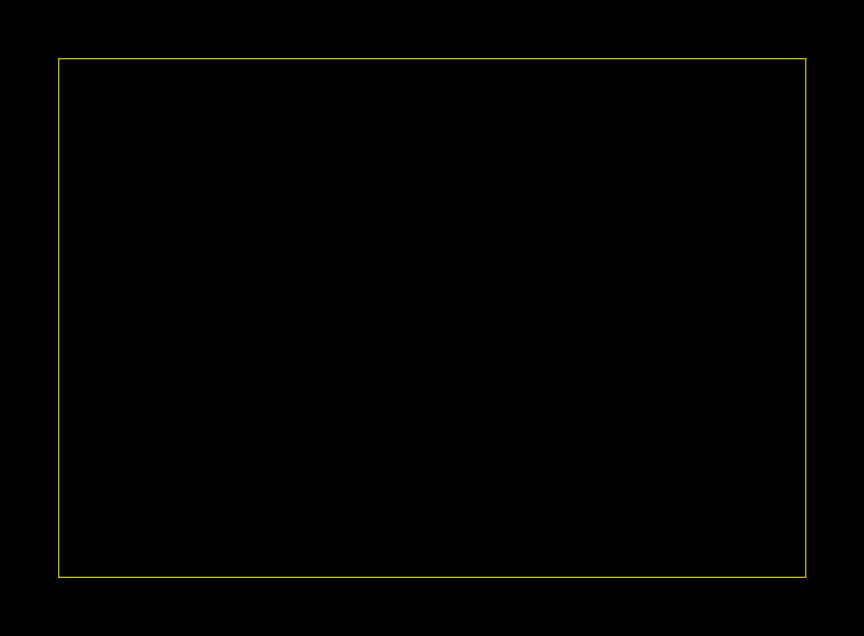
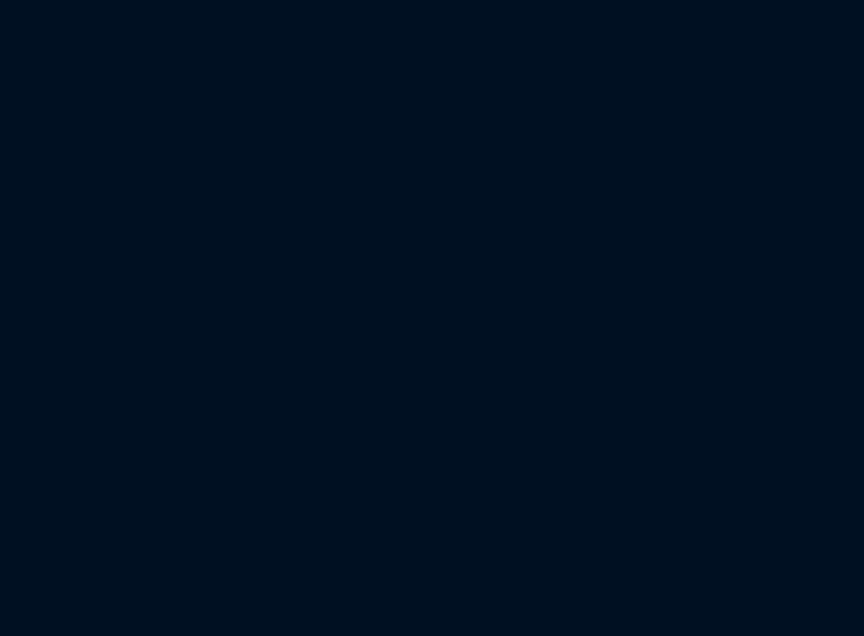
board edge: (805, 58) (58, 58) (58, 577) (805, 577) (805, 58) -> none

